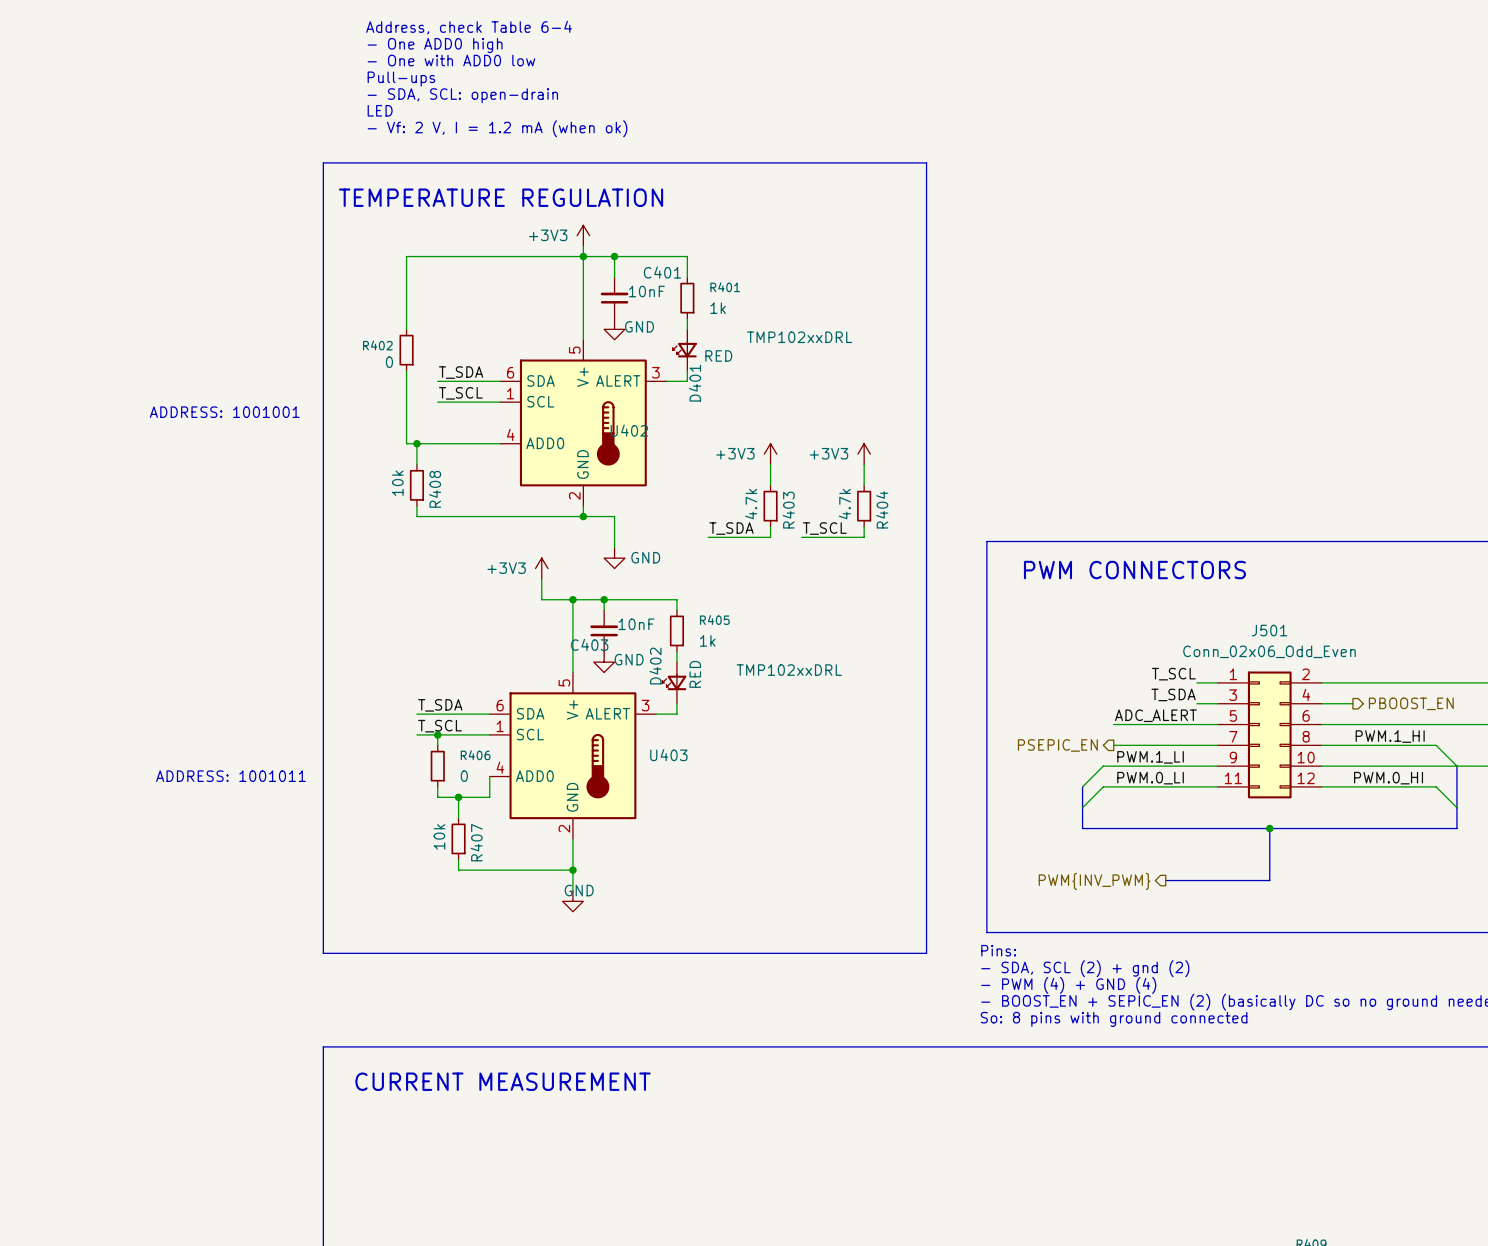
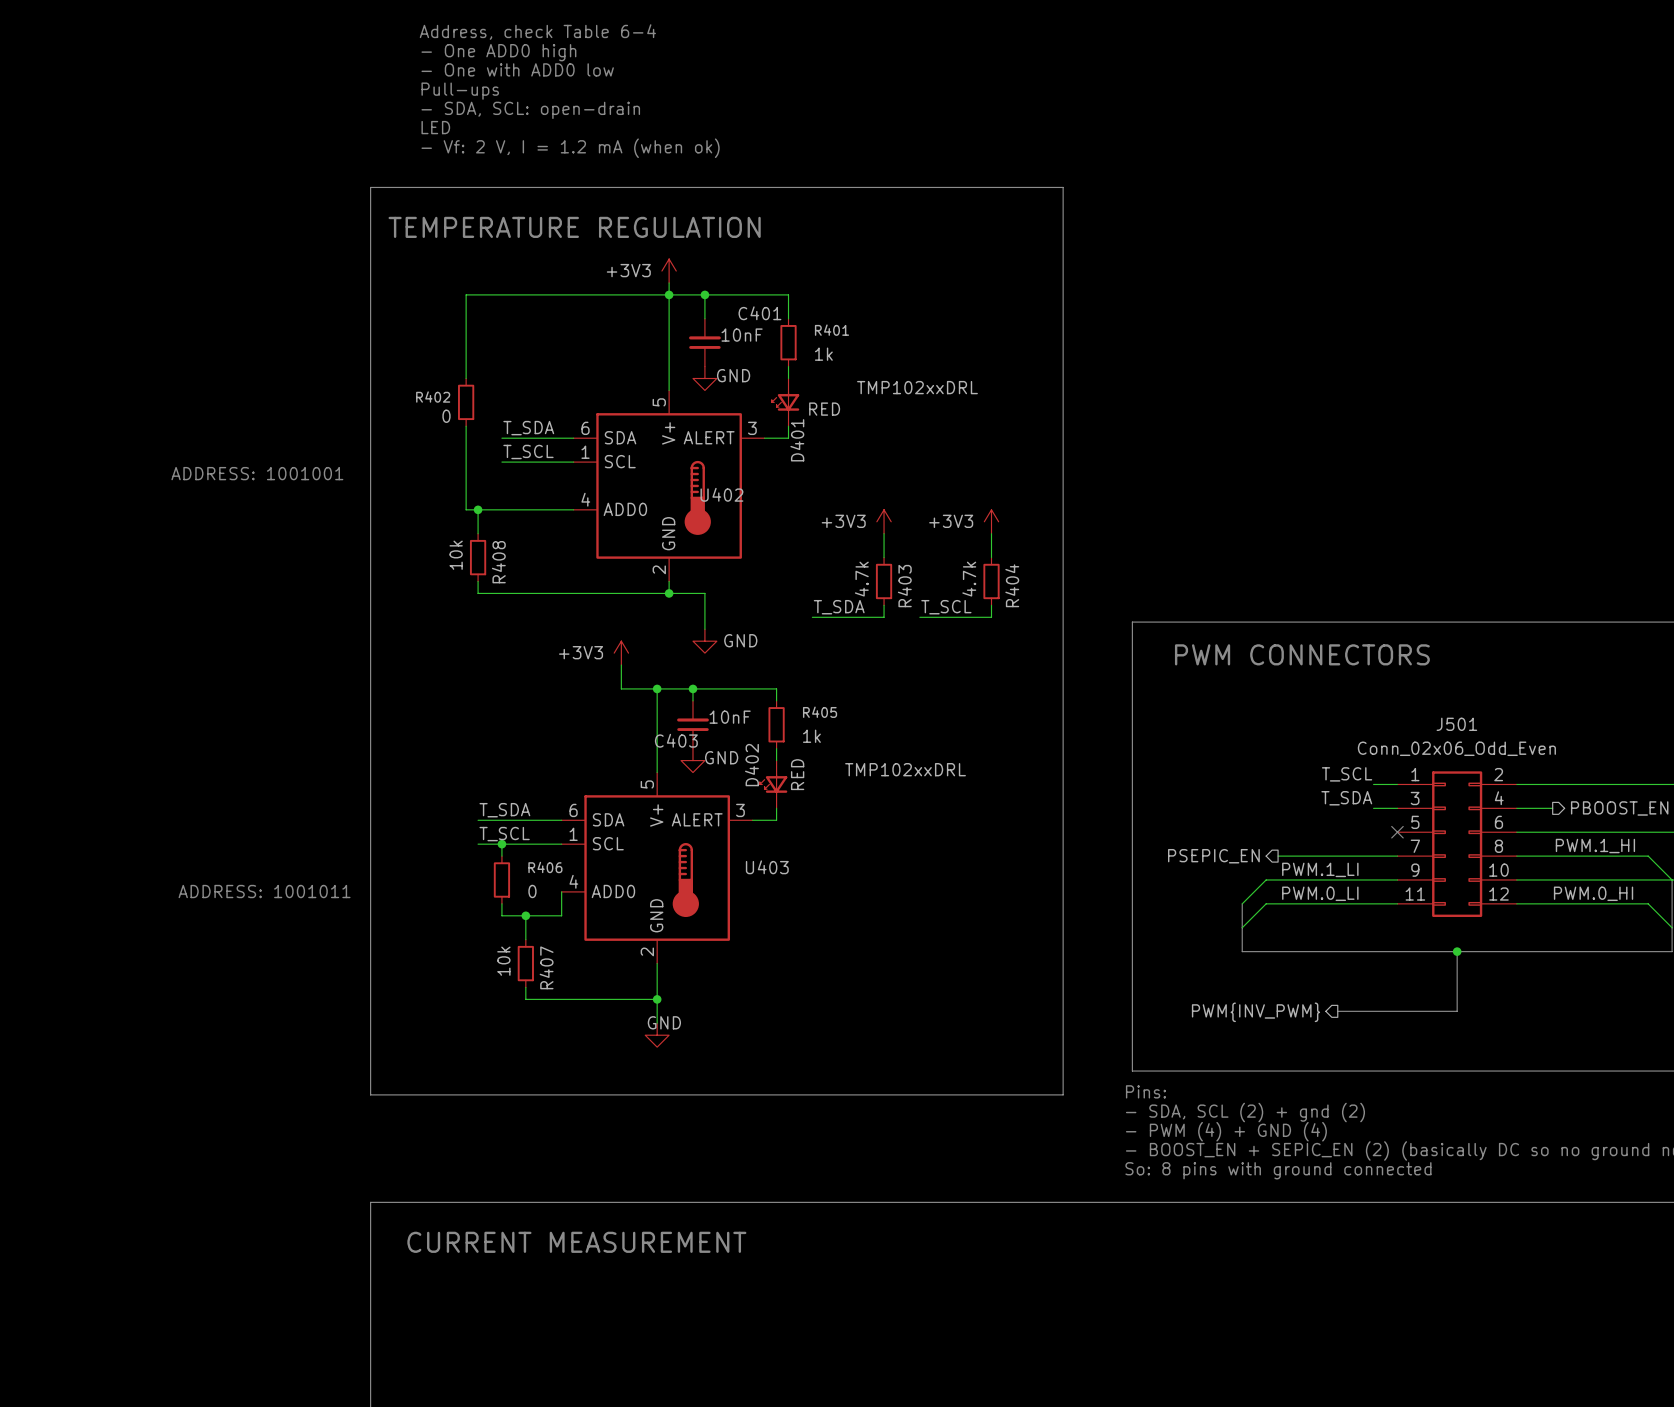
label: ADC_ALERT (1155, 715) -> none
wire: (1113, 724) (1217, 724) -> none
no-connect mark: none -> (1397, 832)

